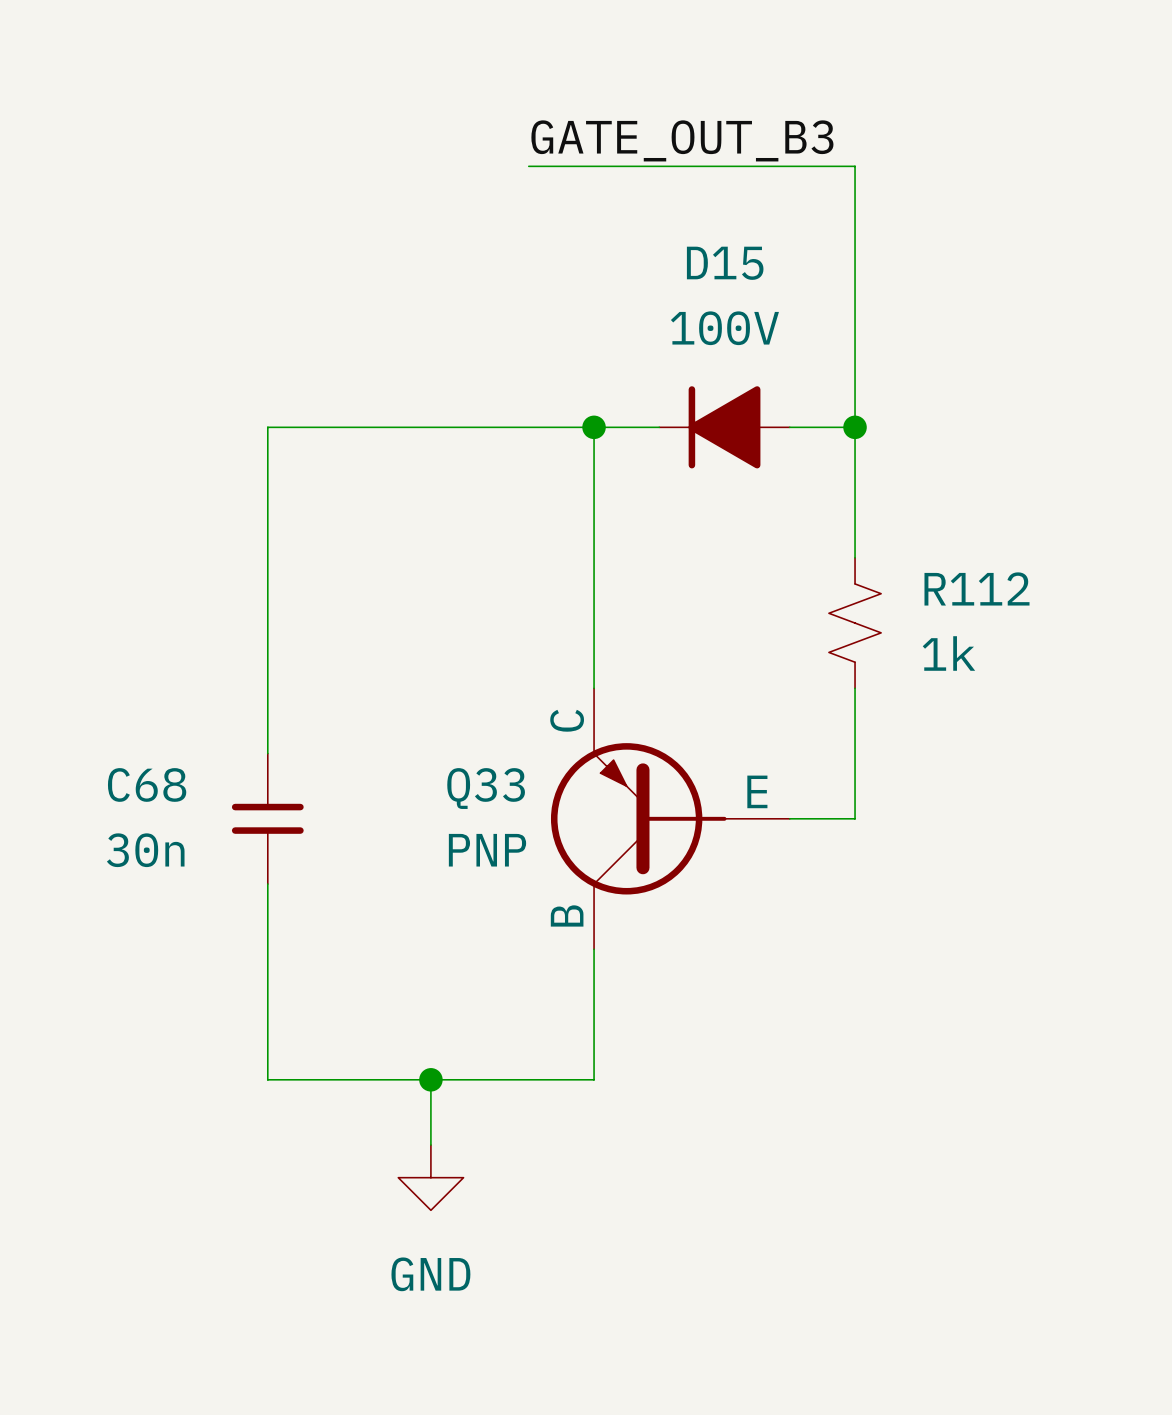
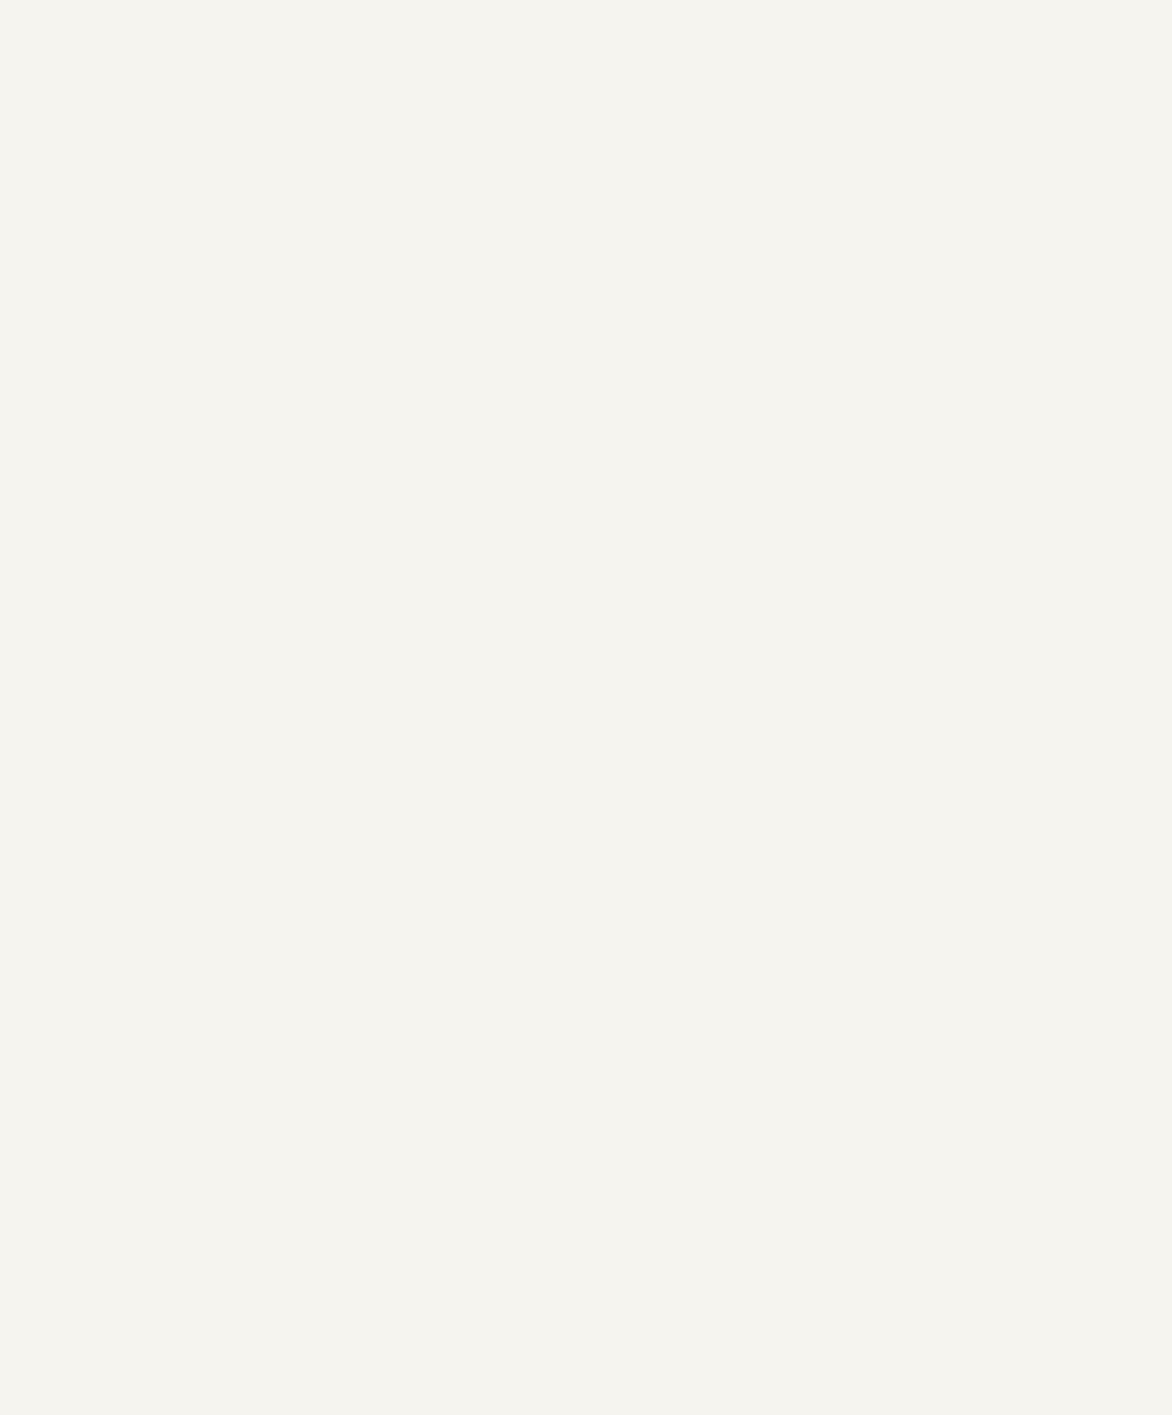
label: GATE_OUT_B3 (682, 140) -> none
wire: (528, 166) (855, 166) (855, 557) -> none
wire: (594, 427) (594, 688) -> none
junction: (594, 427) -> none
wire: (659, 427) (267, 427) (267, 753) -> none
D15: 100V (724, 427) -> none
wire: (789, 427) (855, 427) -> none
junction: (855, 427) -> none
R112: 1k (855, 623) -> none
wire: (855, 688) (855, 818) (789, 818) -> none
C68: 30n (267, 818) -> none
Q33: PNP (670, 818) -> none
wire: (267, 884) (267, 1079) (594, 1079) (594, 949) -> none
wire: (430, 1079) (430, 1145) -> none
junction: (430, 1079) -> none
power symbol: GND (430, 1177) -> none

